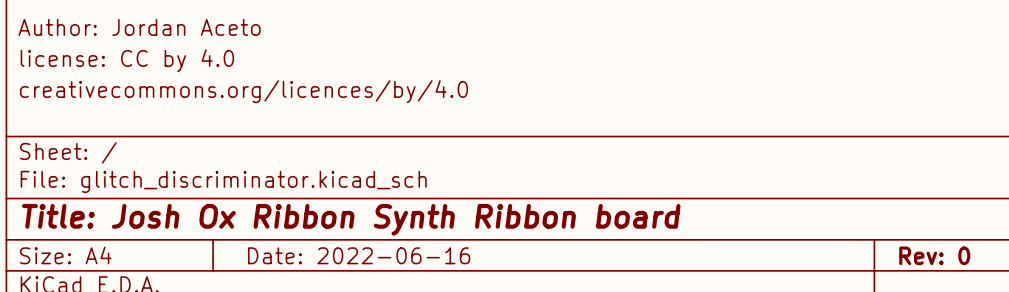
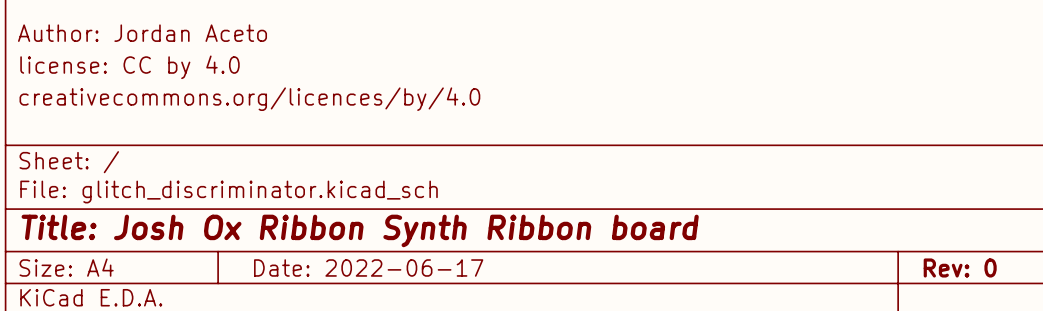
title block: Date: 2022-06-16 (359, 255) -> Date: 2022-06-17 (368, 267)

